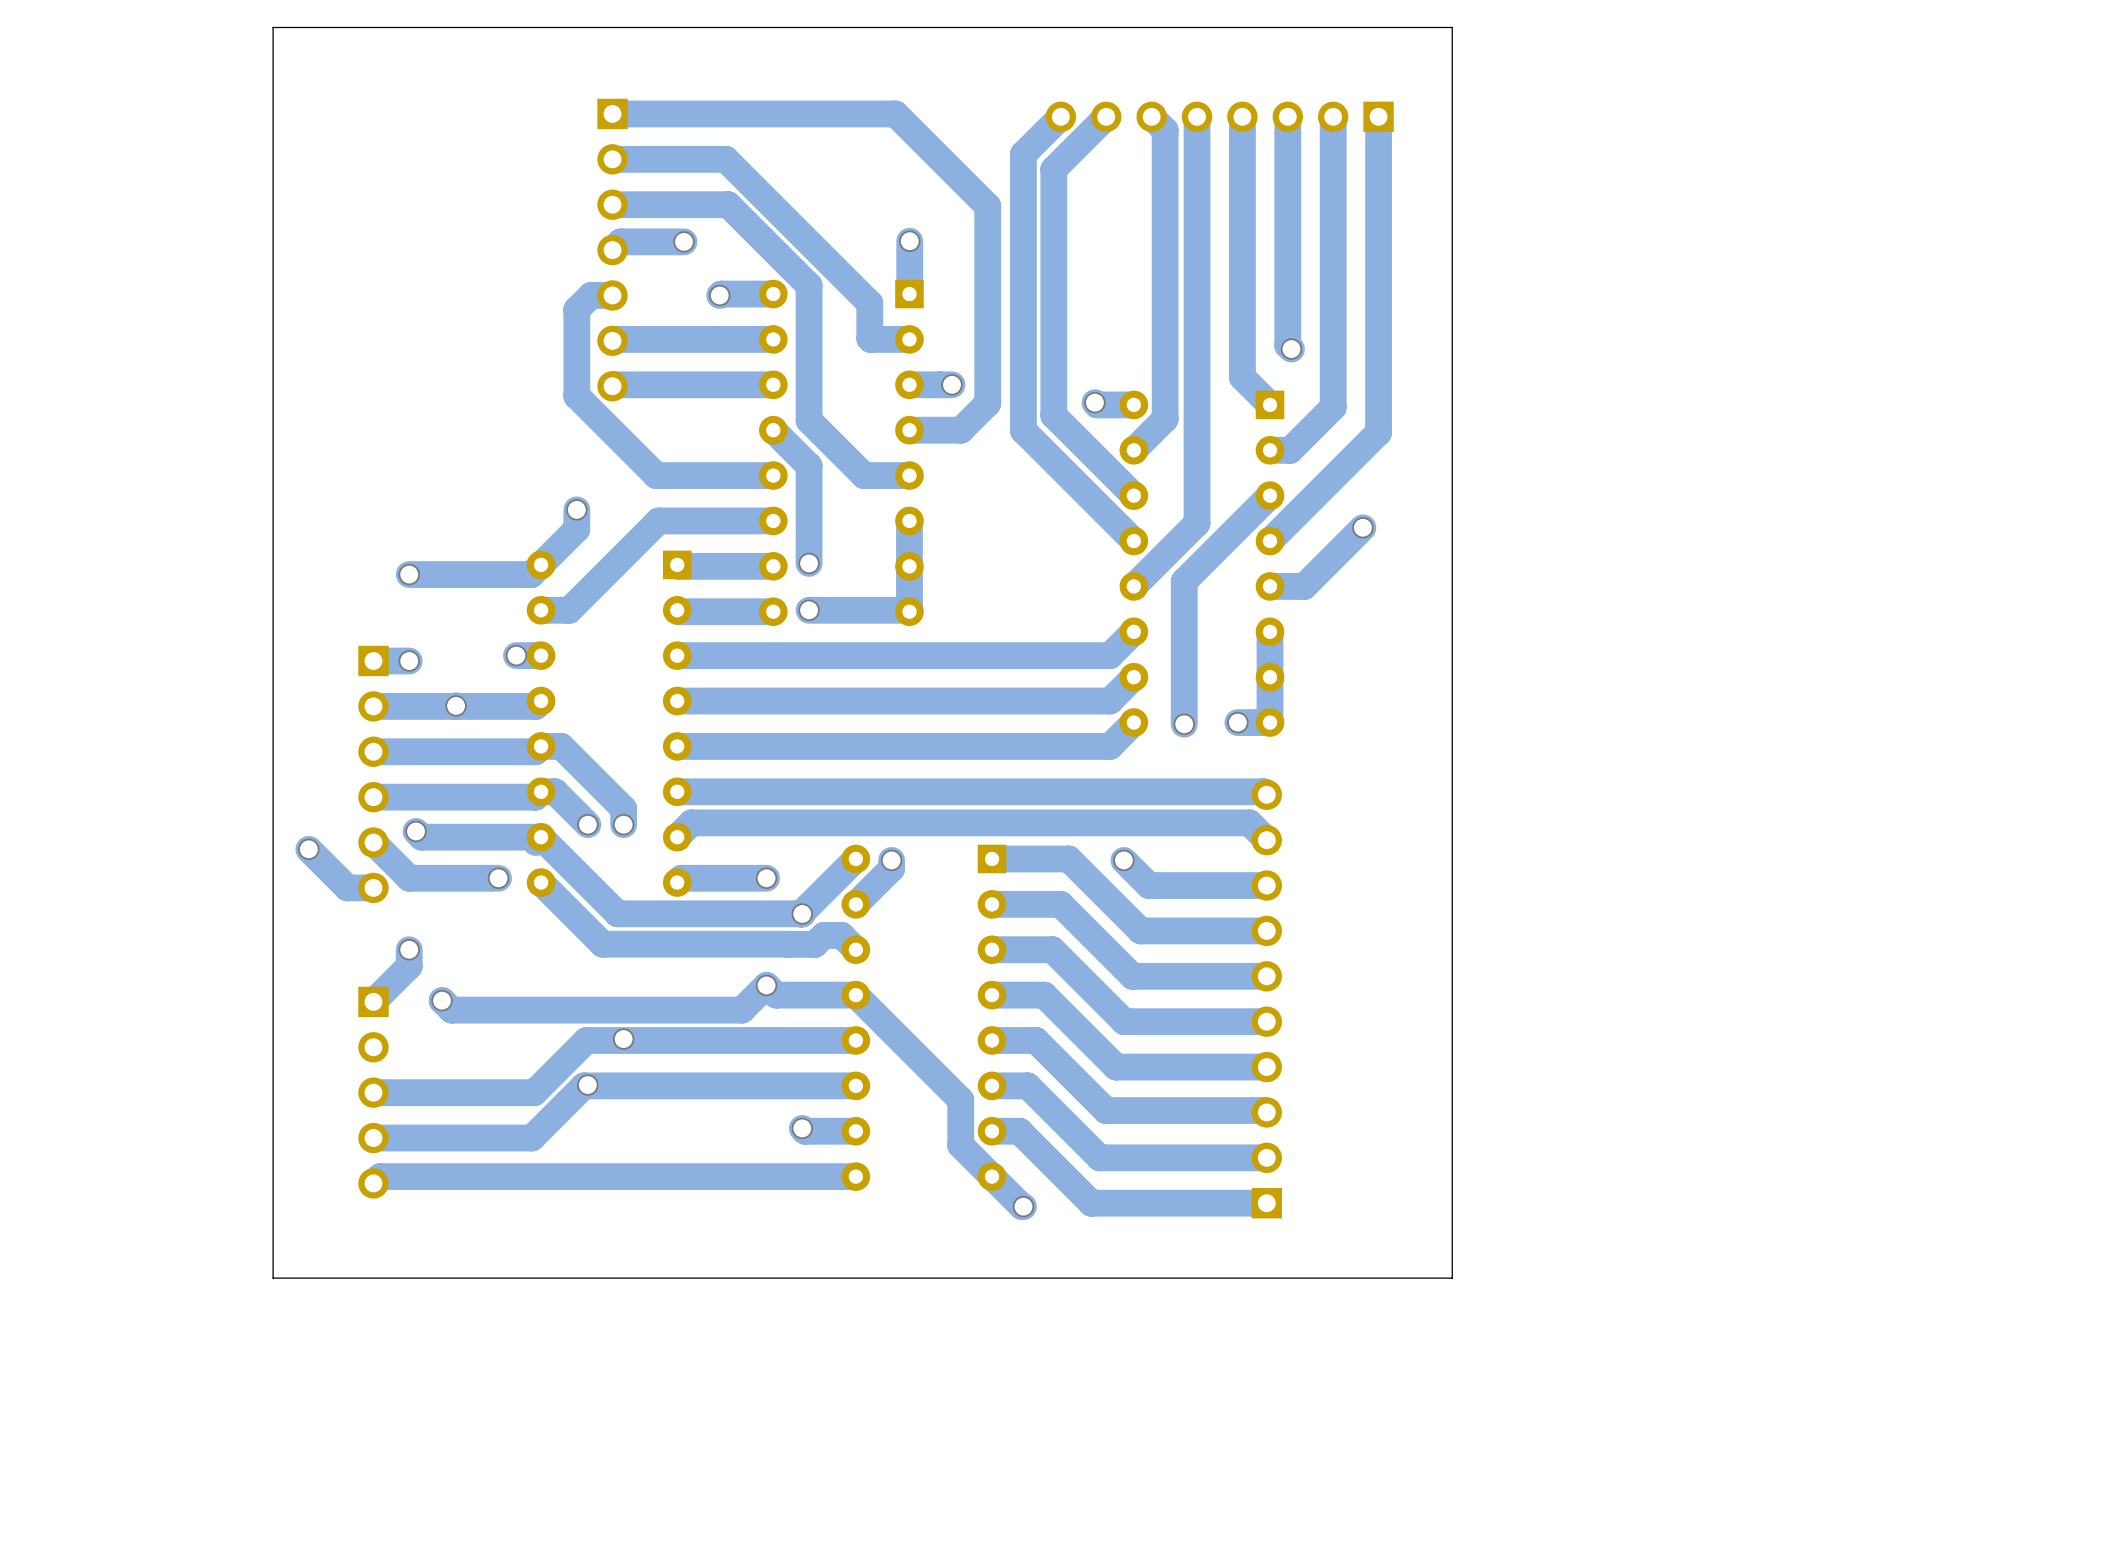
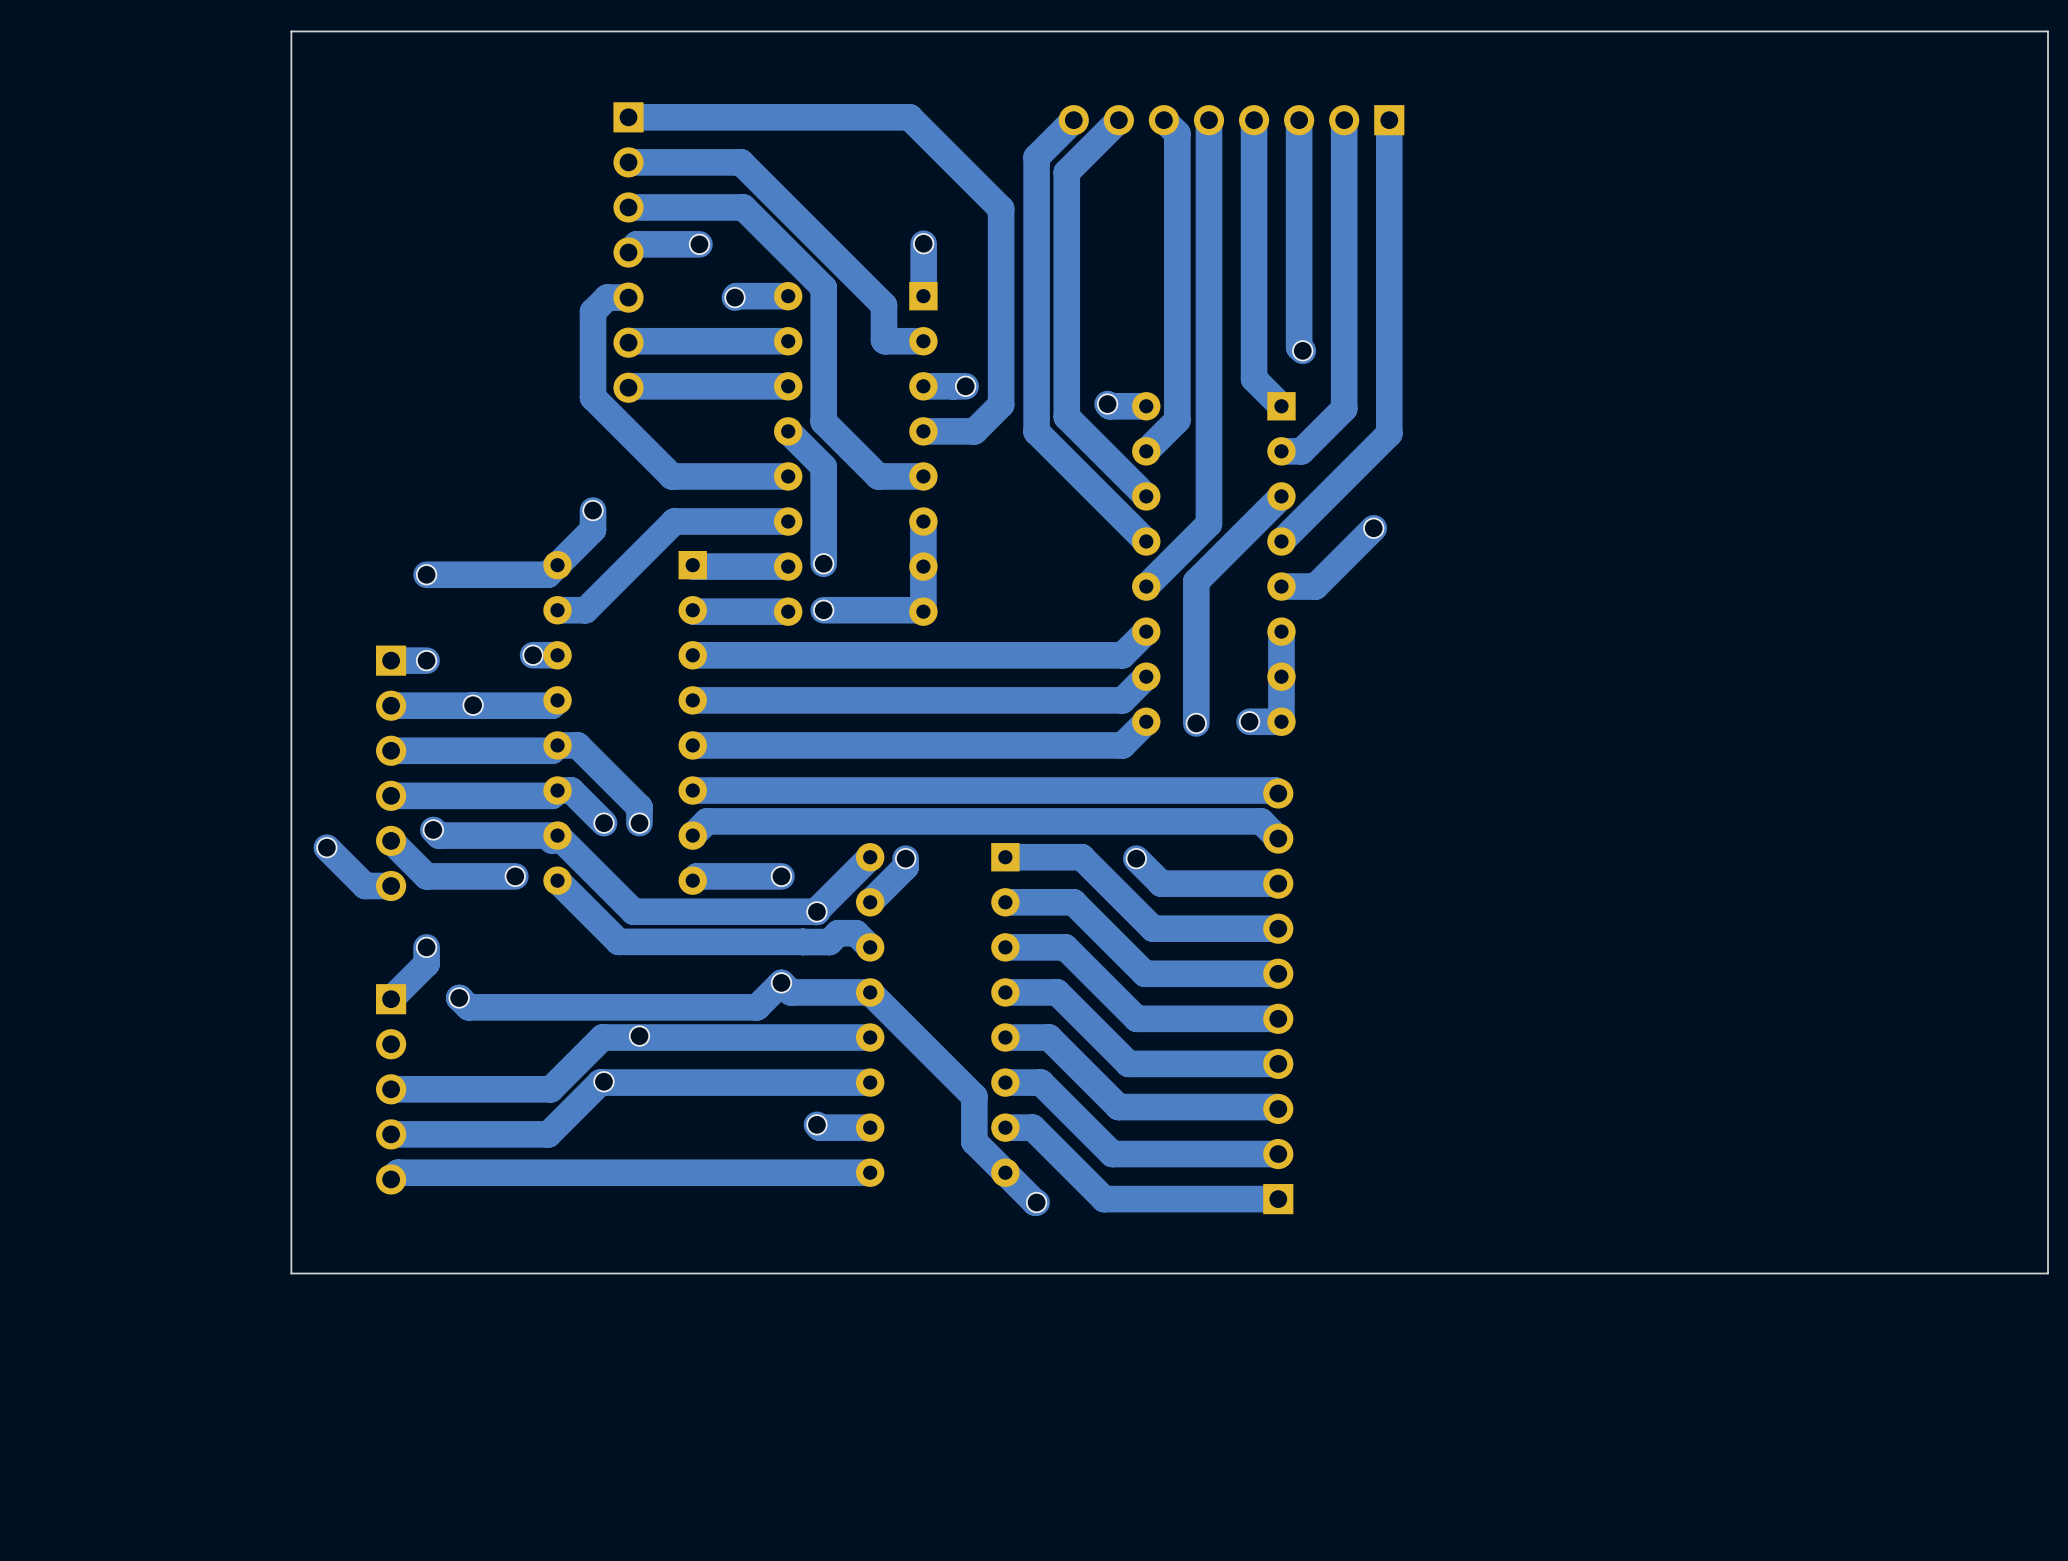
board edge: (1452, 27) (1452, 1278) -> (1462, 31) (2048, 31) (2048, 1273) (1462, 1273)

